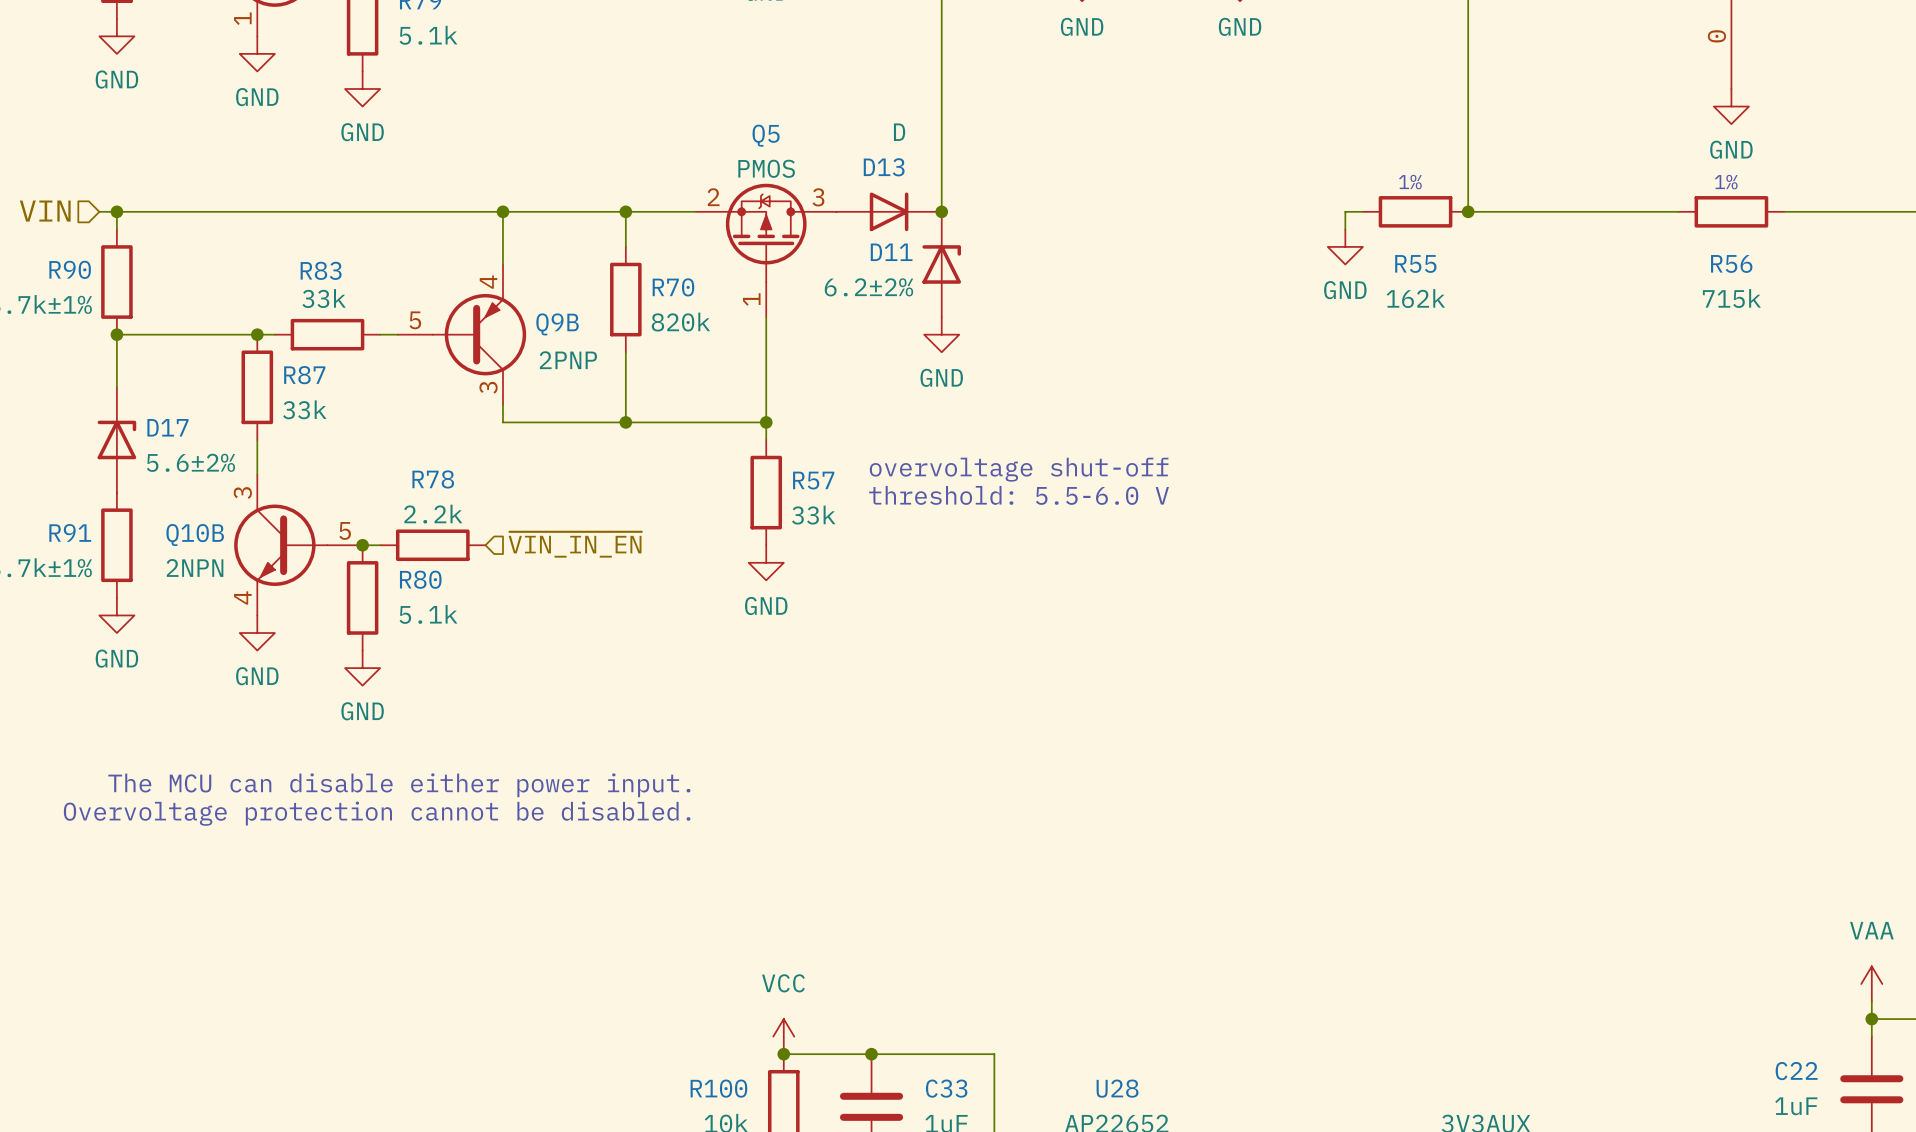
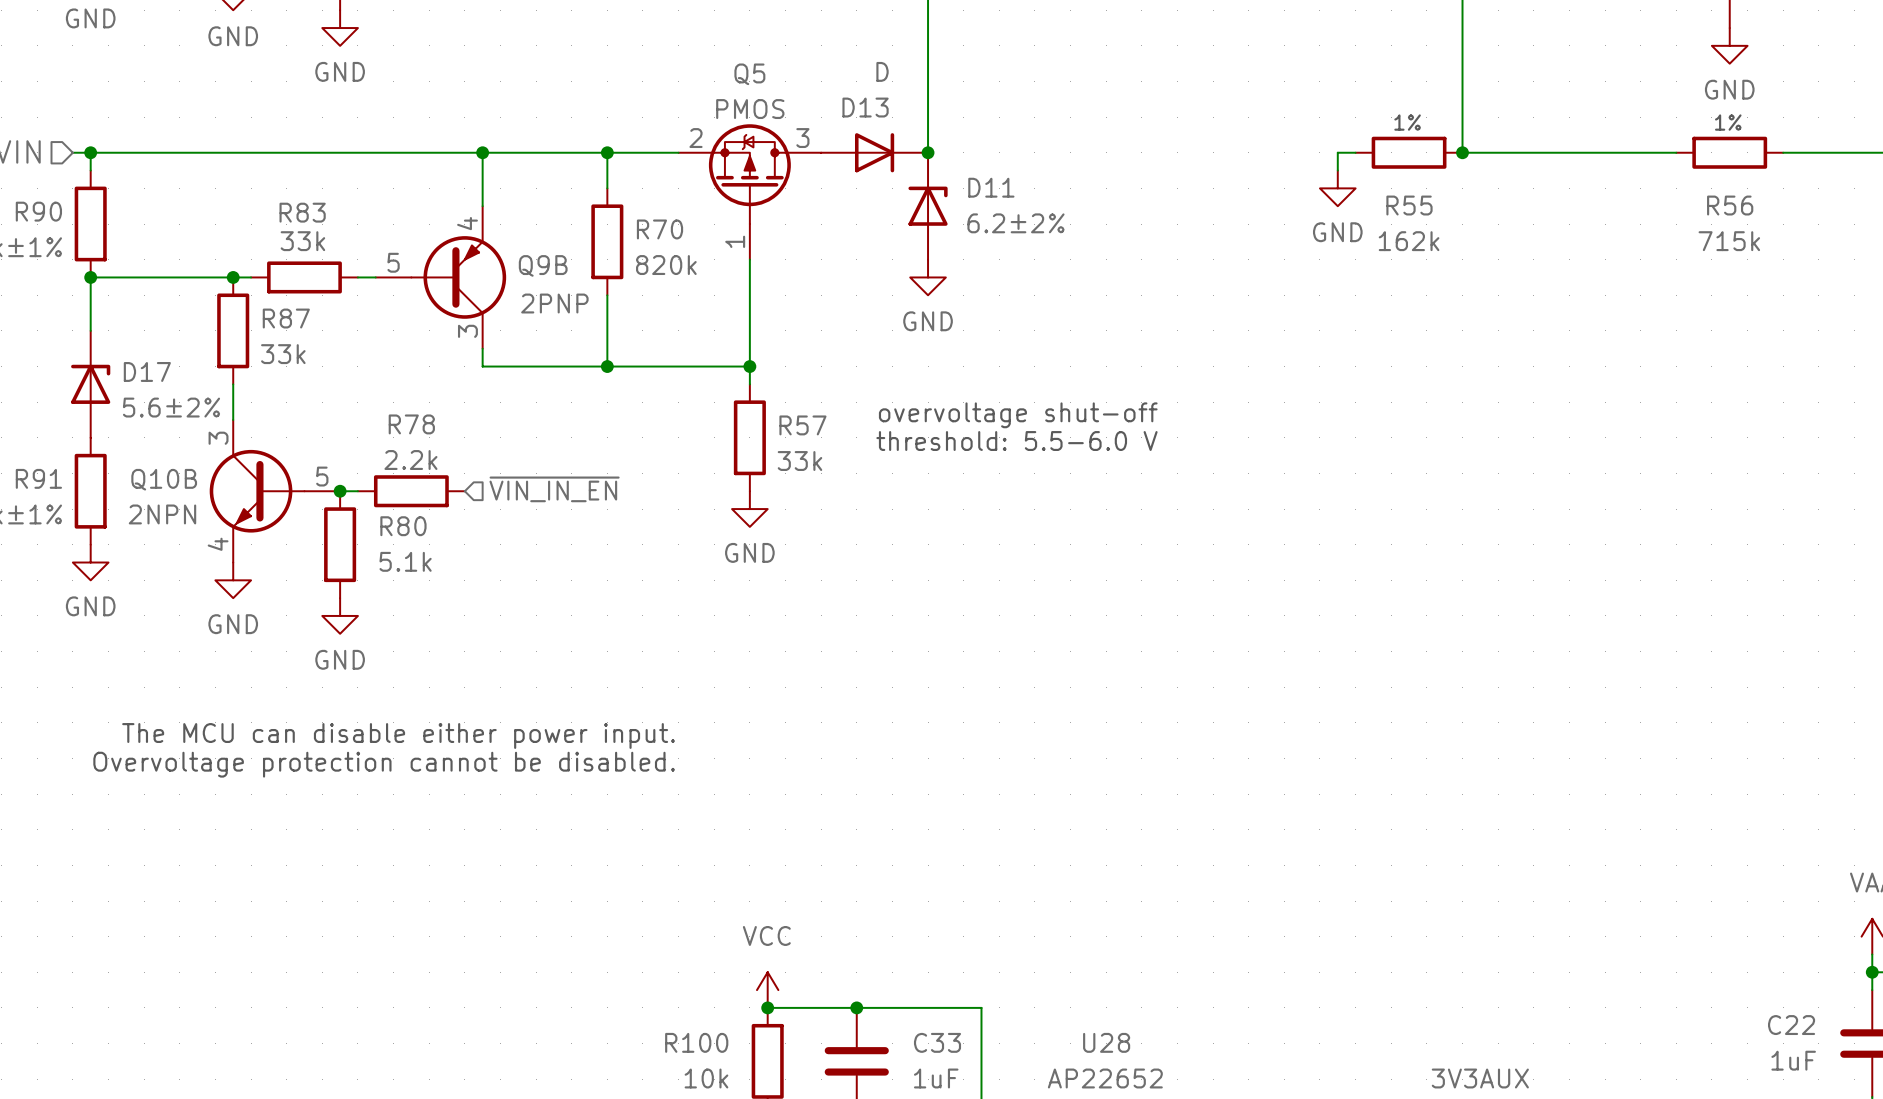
D11 name position: D11 (891, 252) -> D11 (991, 187)
D11 value position: 6.2±2% (868, 287) -> 6.2±2% (1015, 223)

